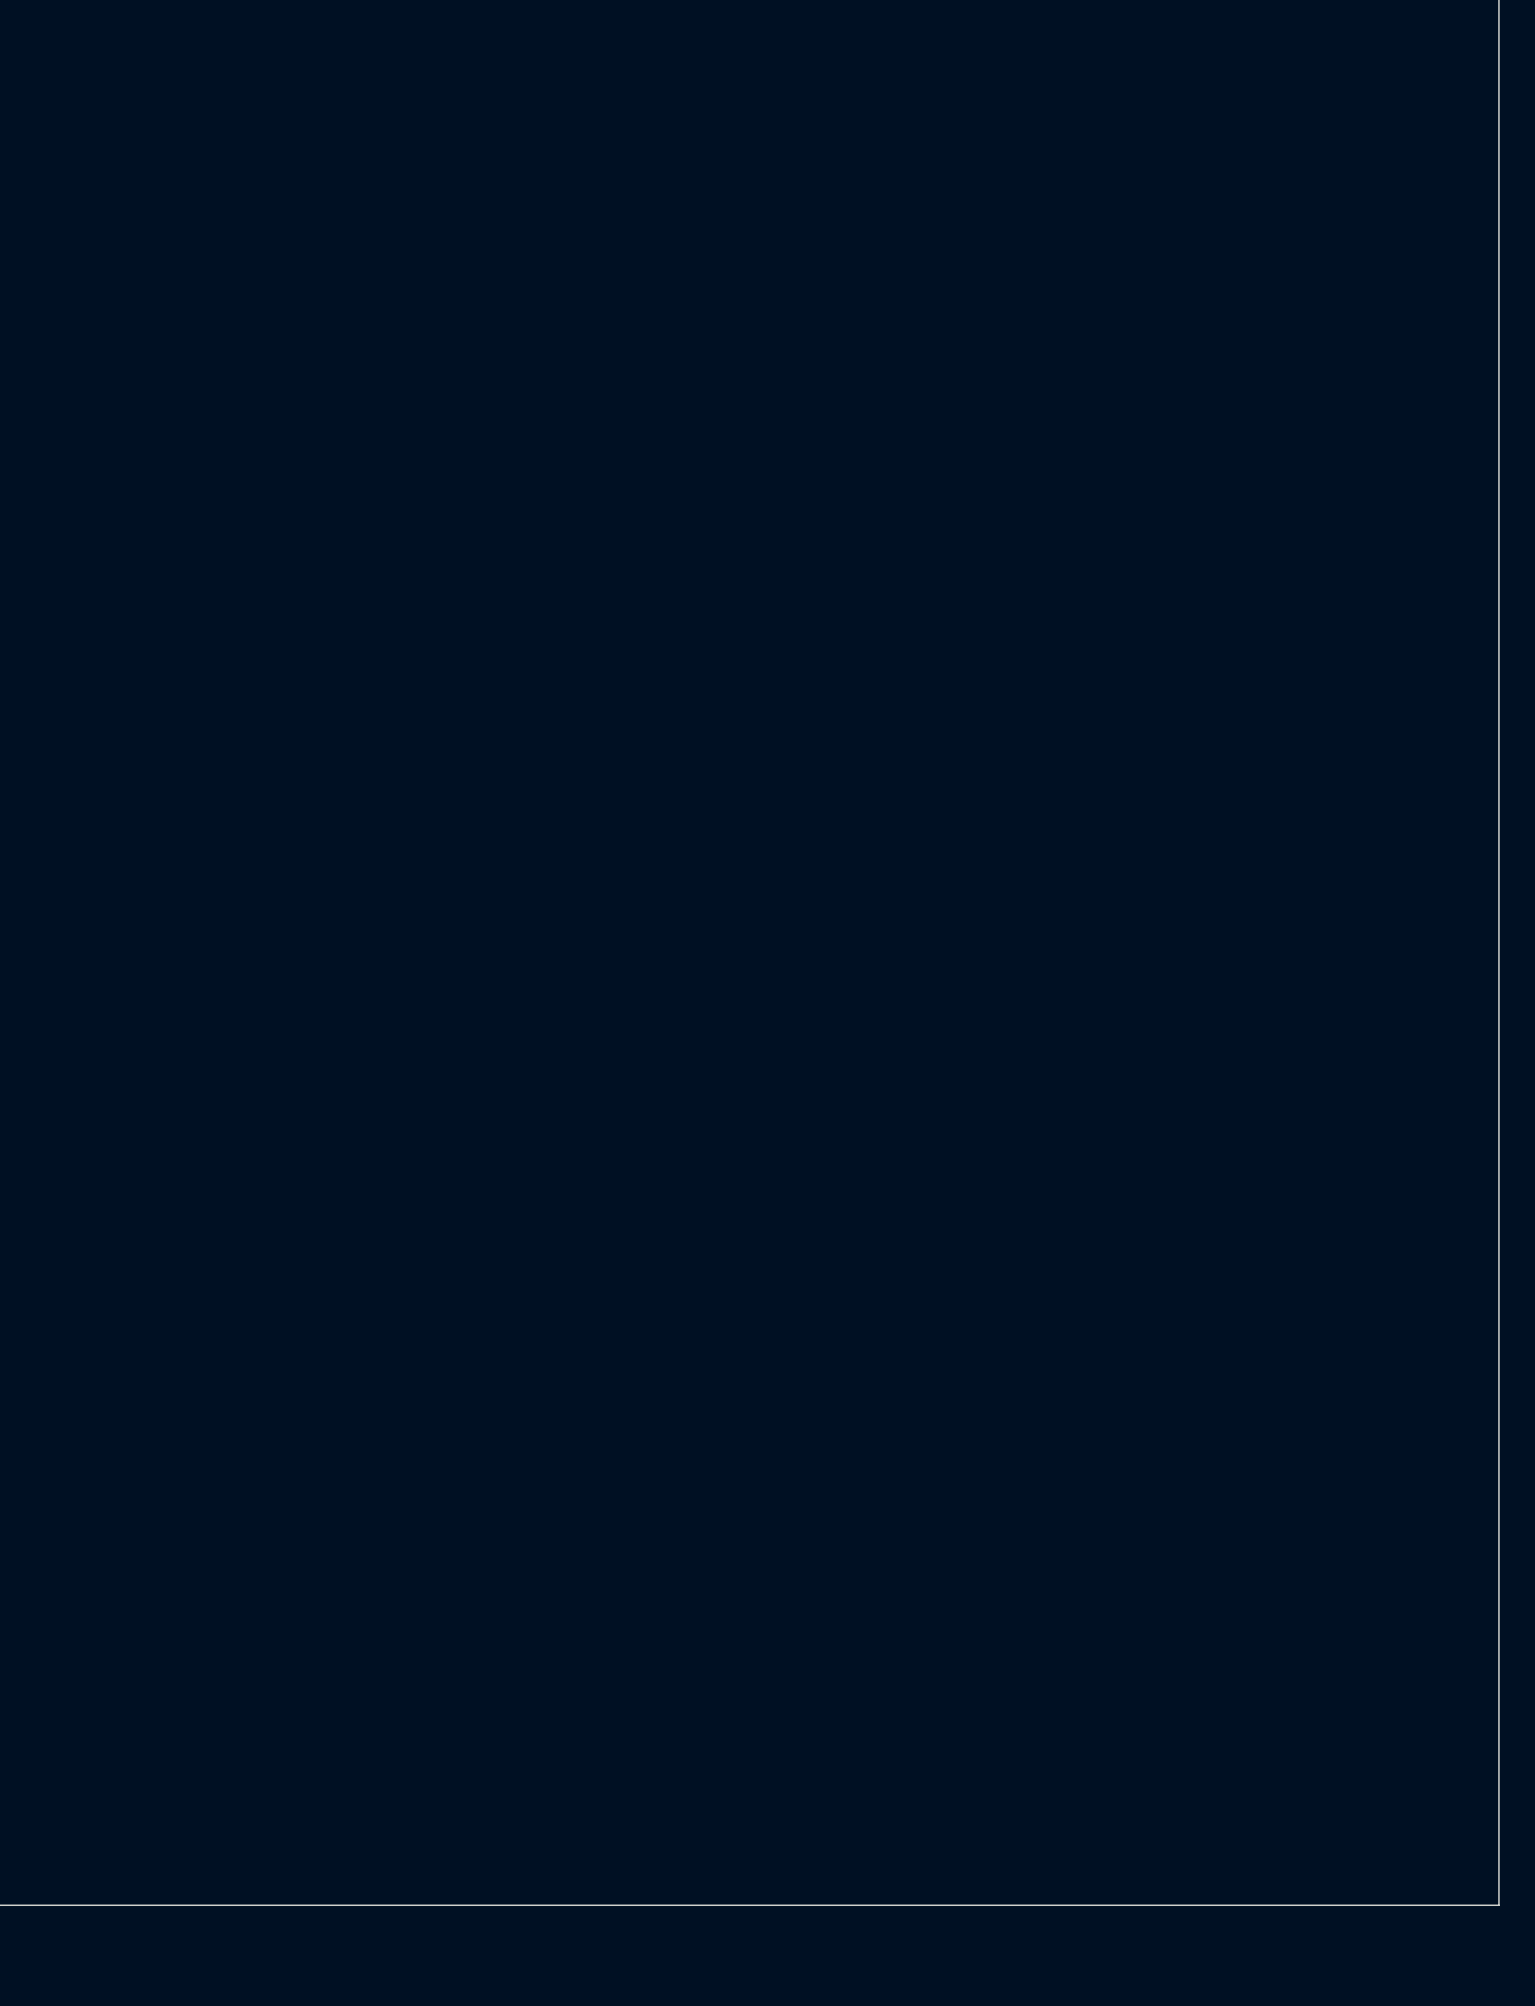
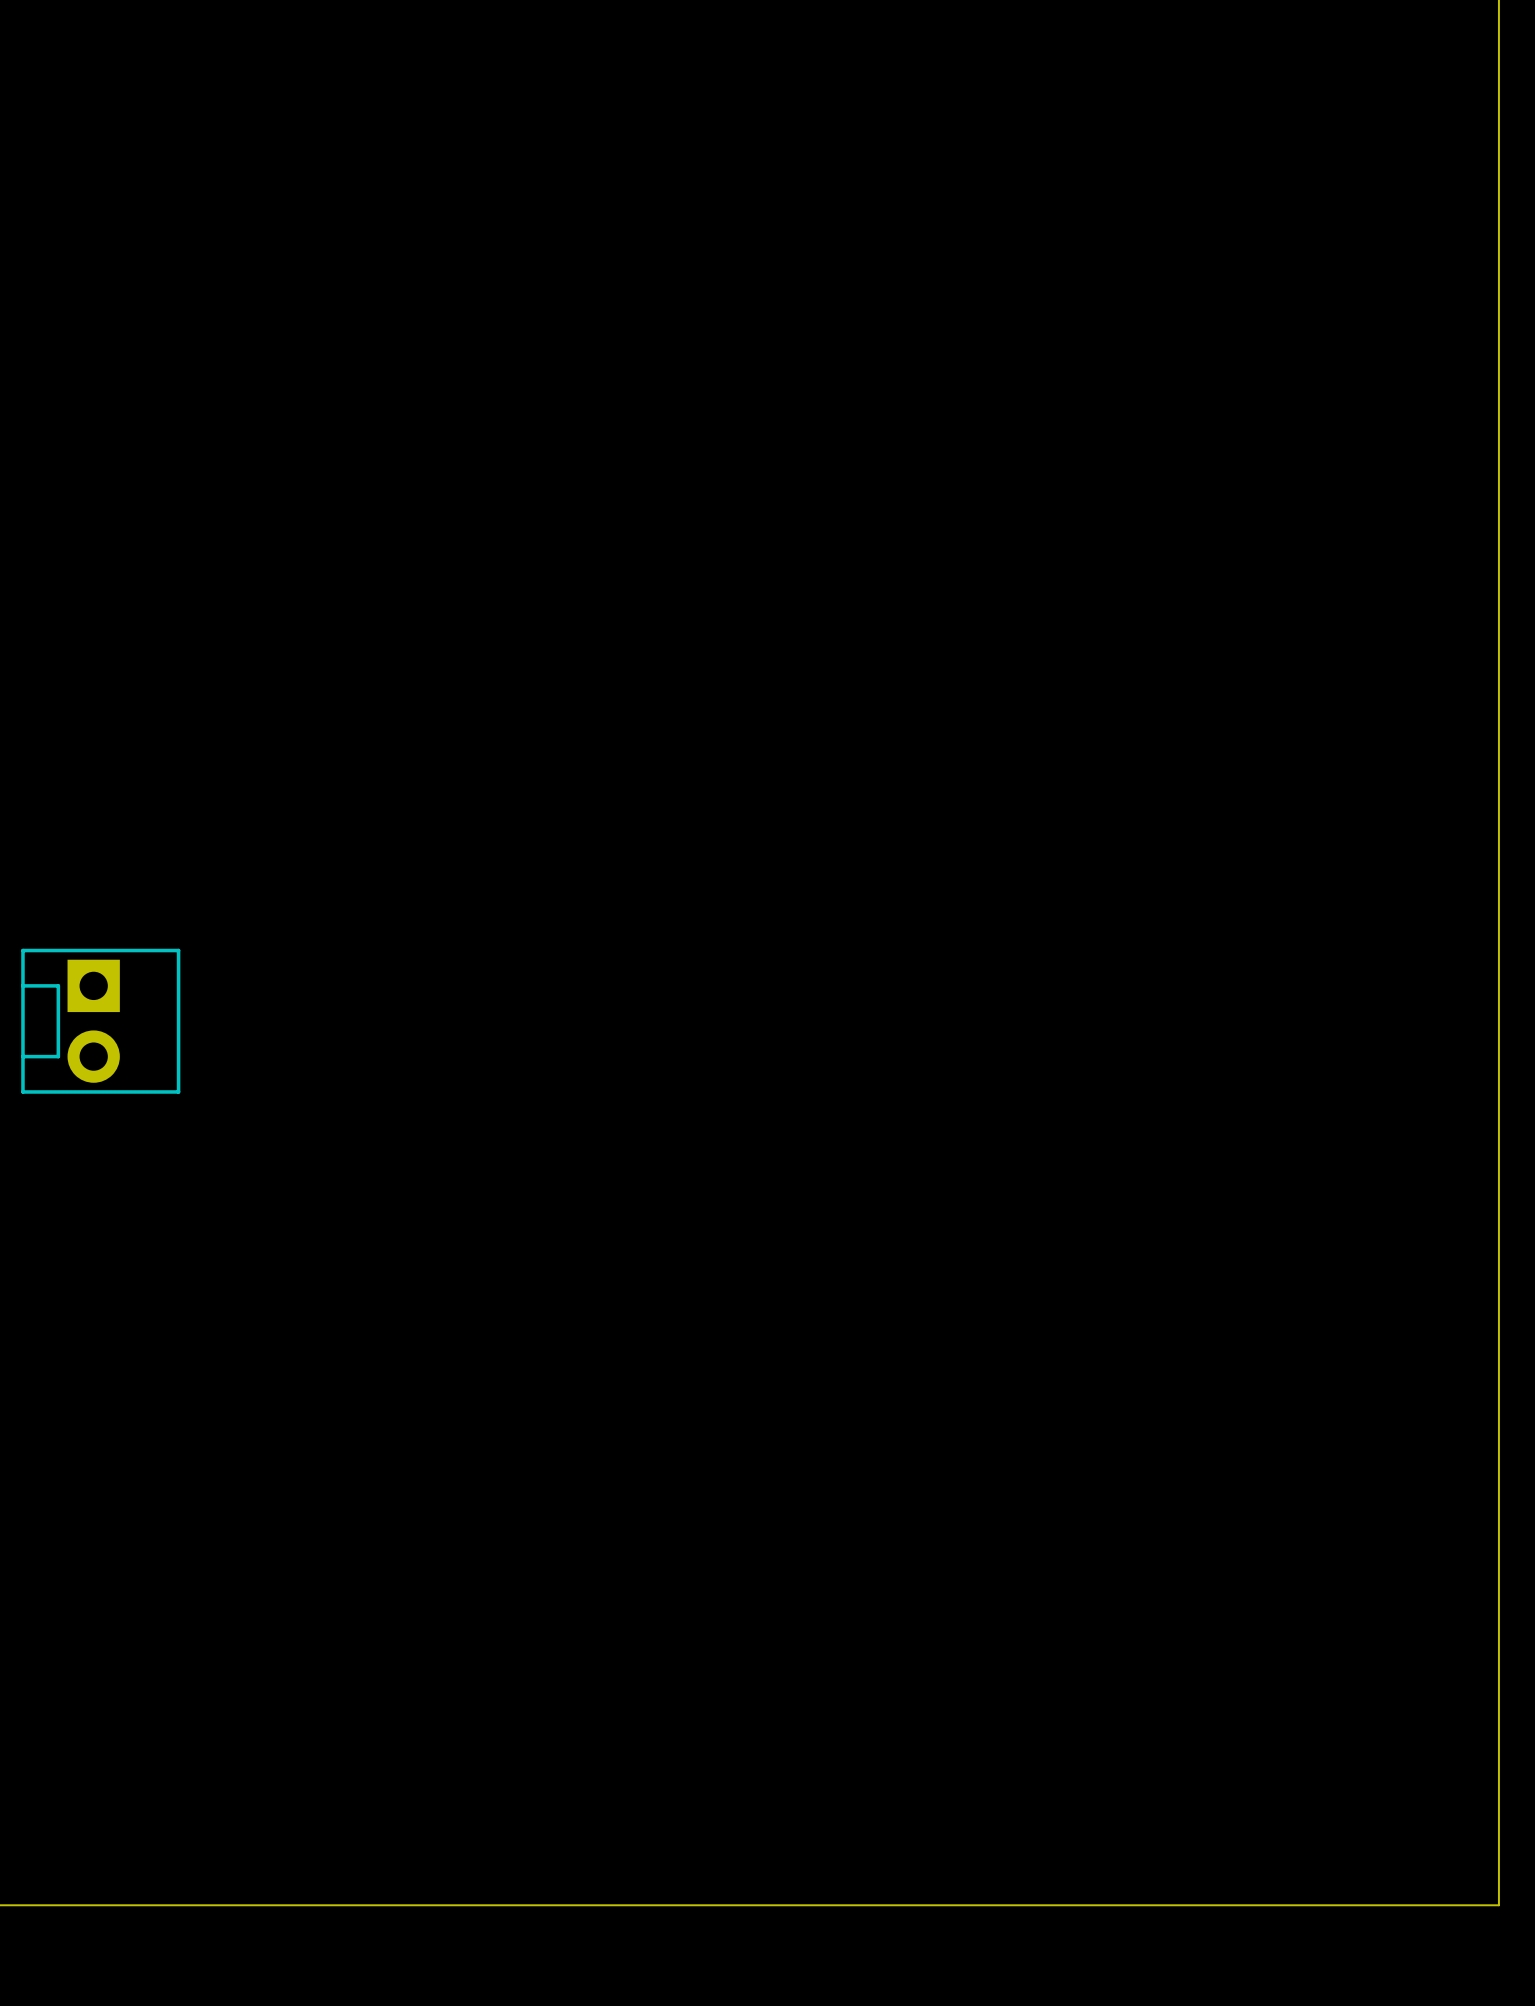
part: none -> (100, 1021)

